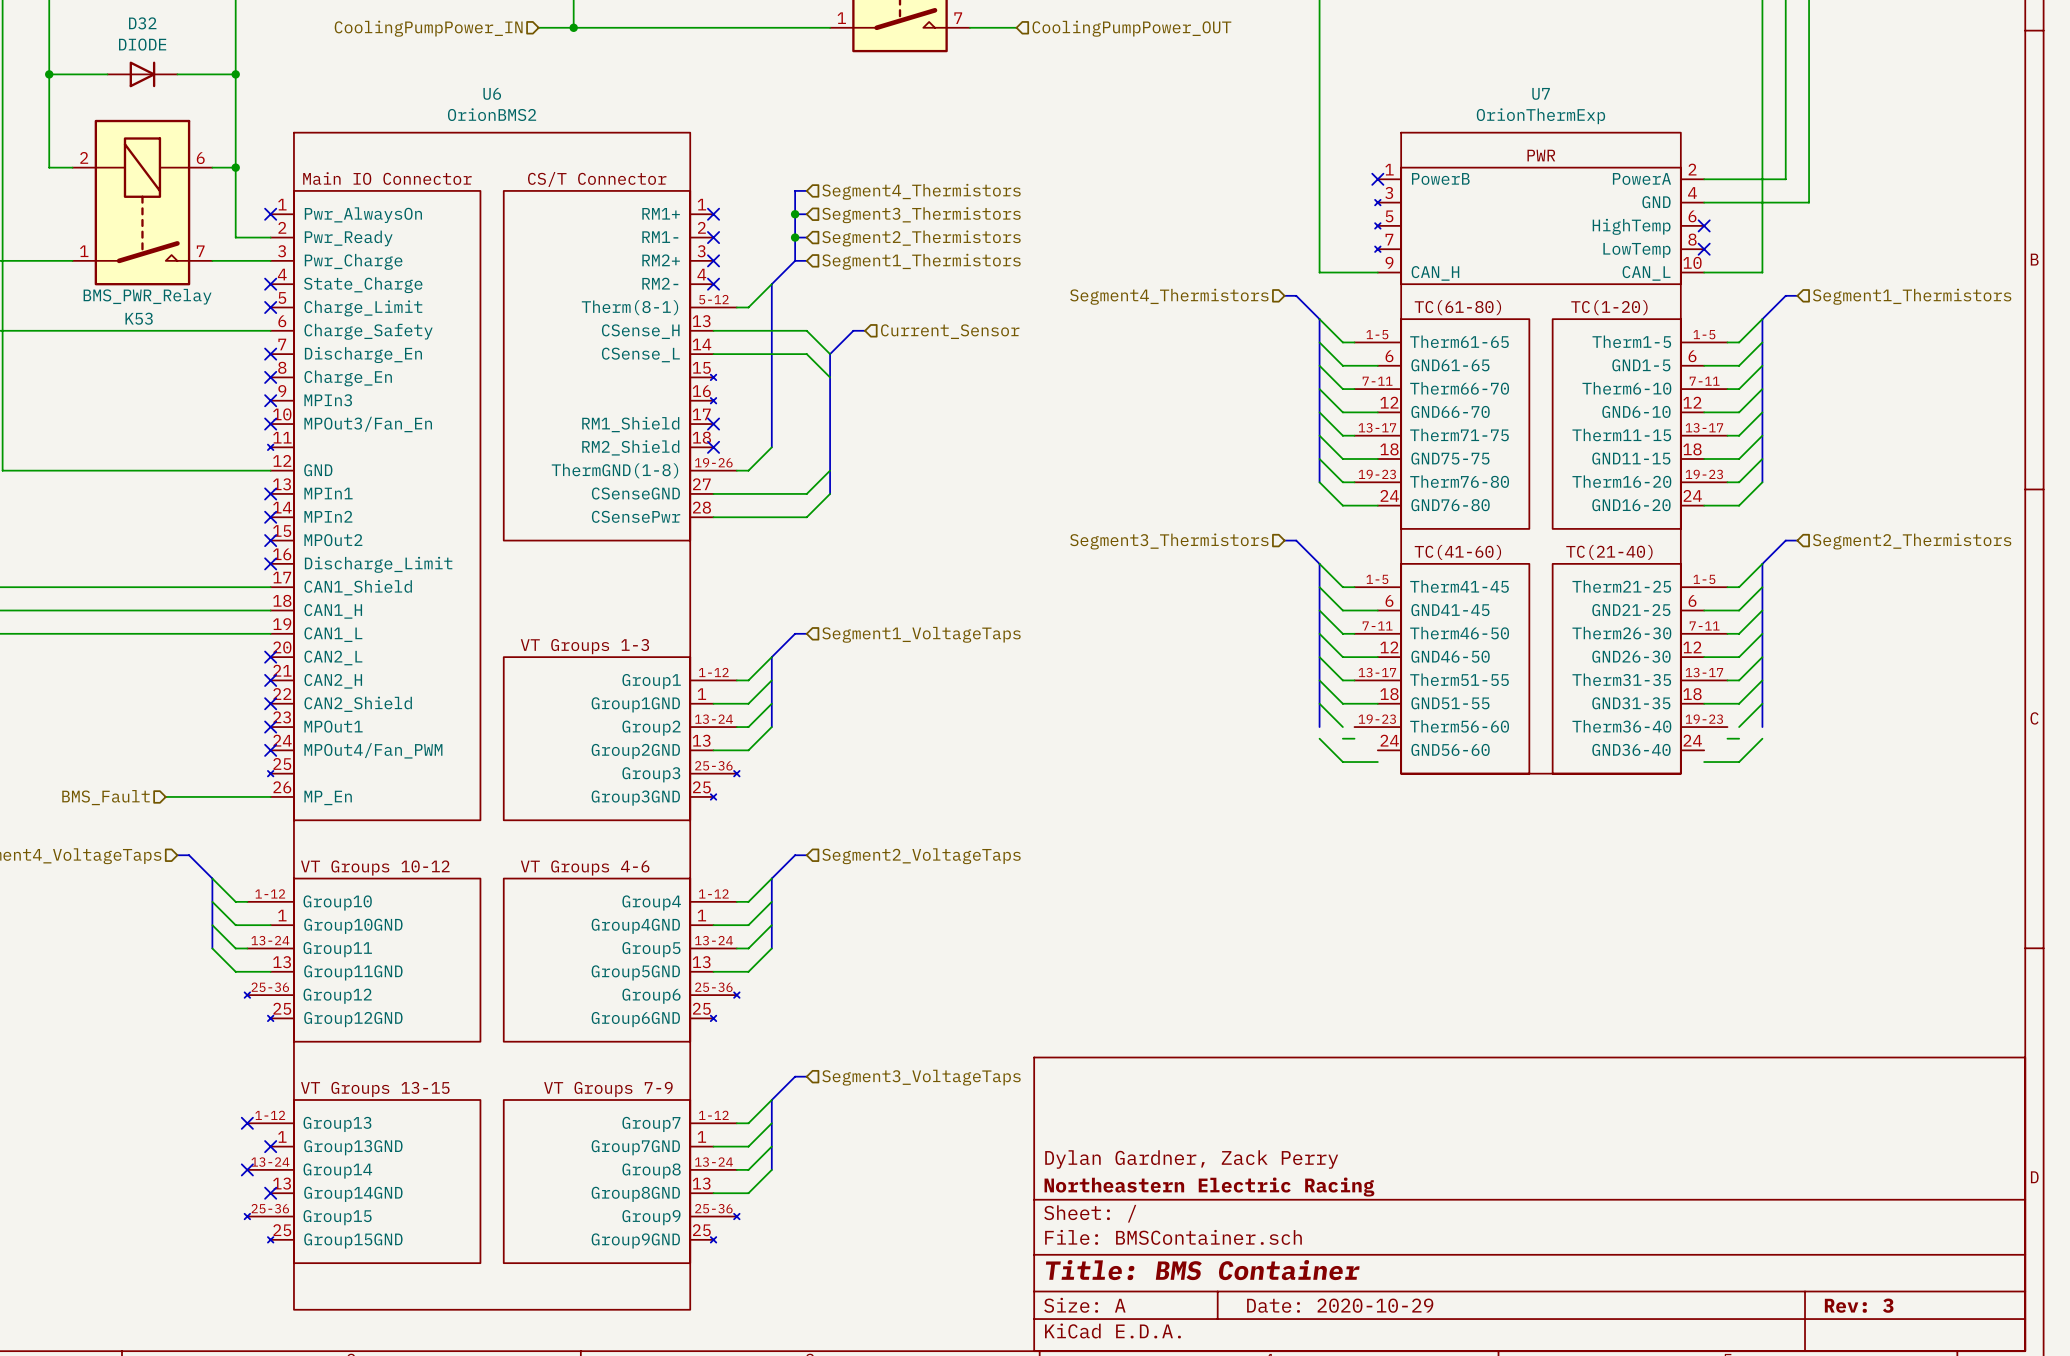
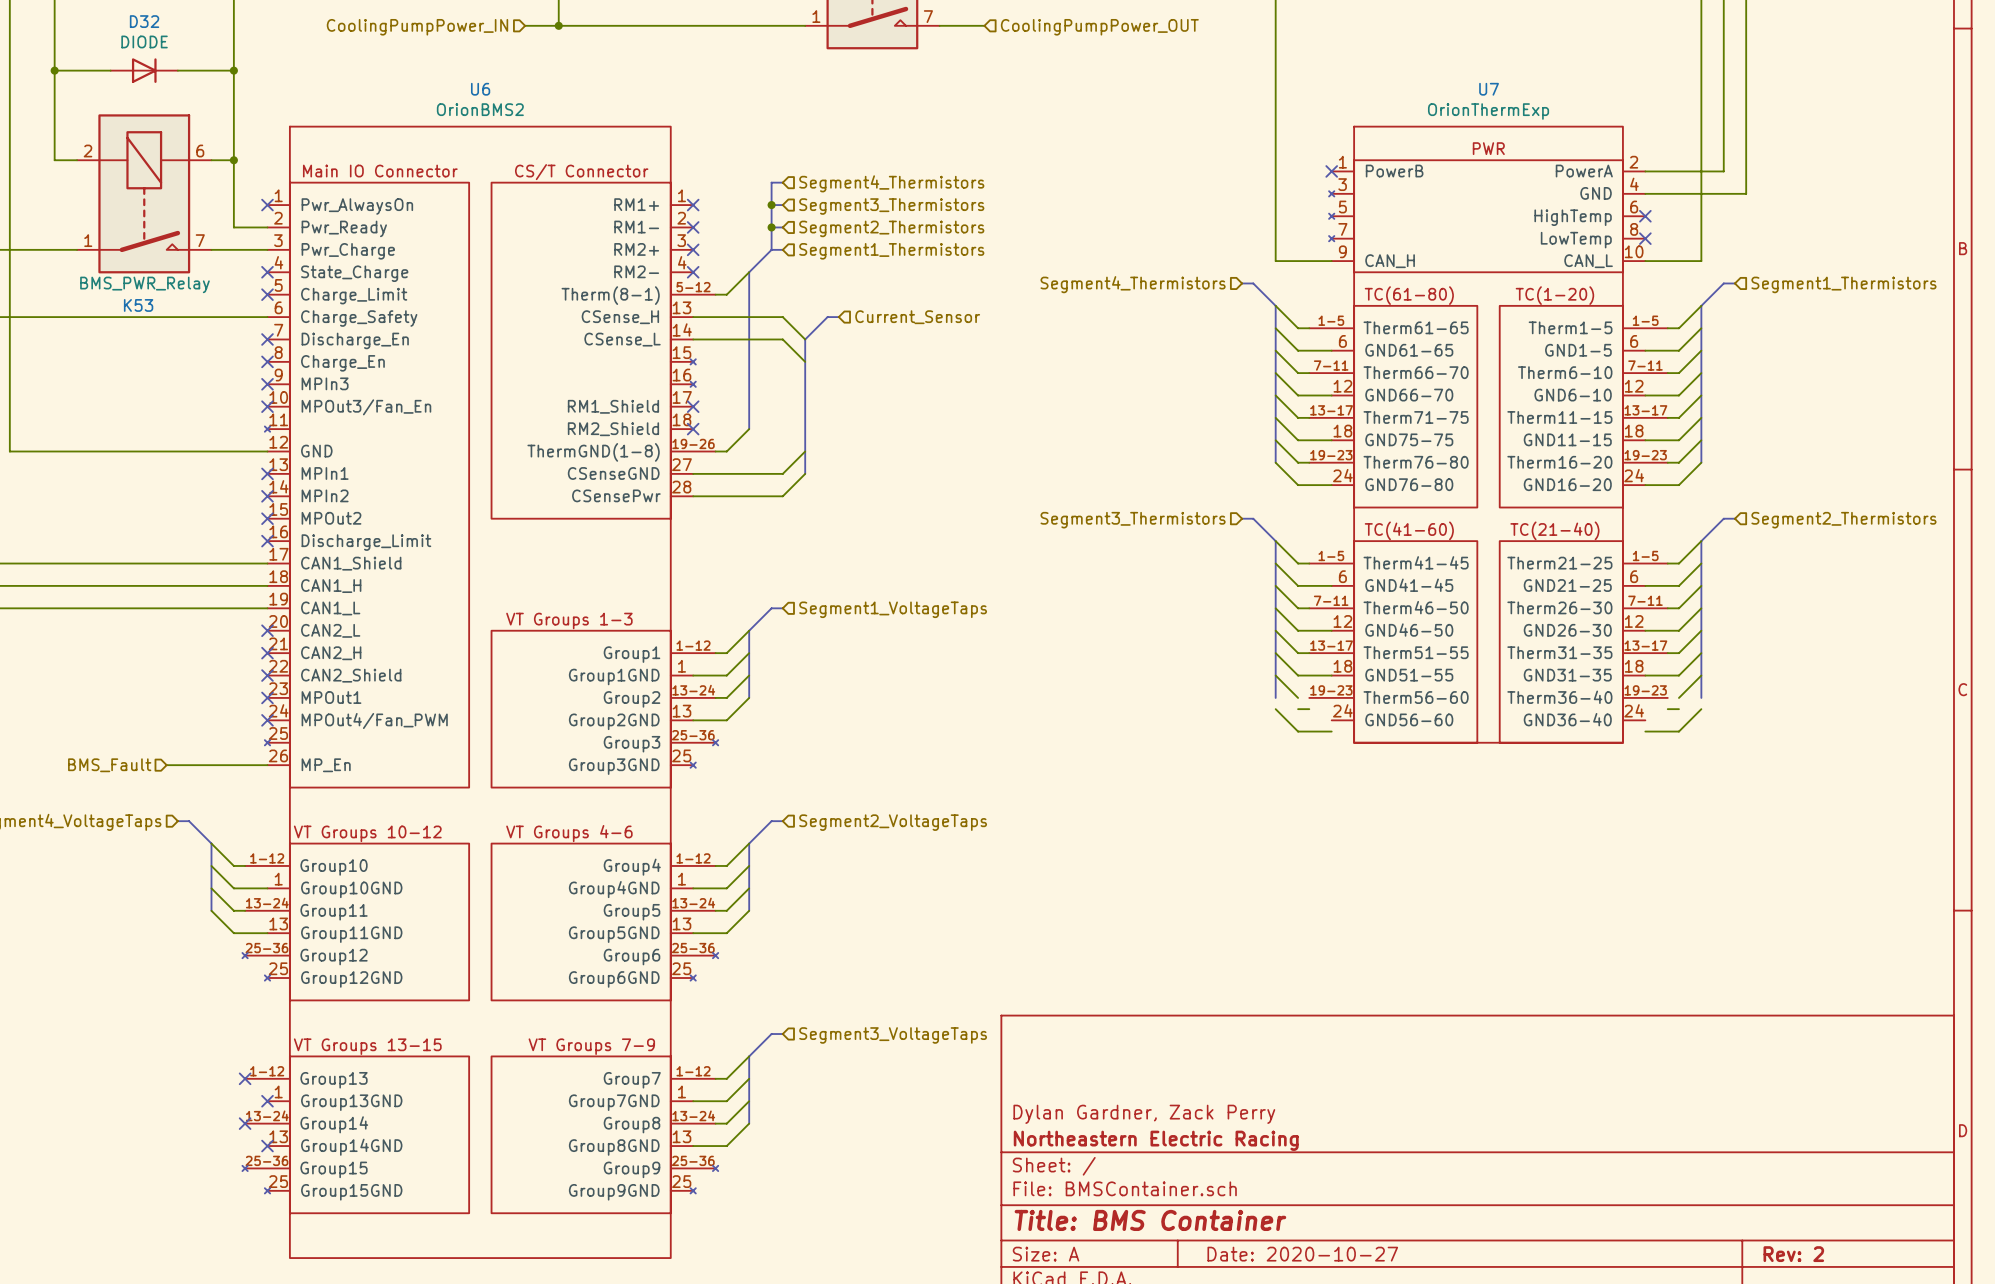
title block: Date: 2020-10-29 (1340, 1305) -> Date: 2020-10-27 (1302, 1254)
title block: Rev: 3 (1859, 1305) -> Rev: 2 (1793, 1254)

